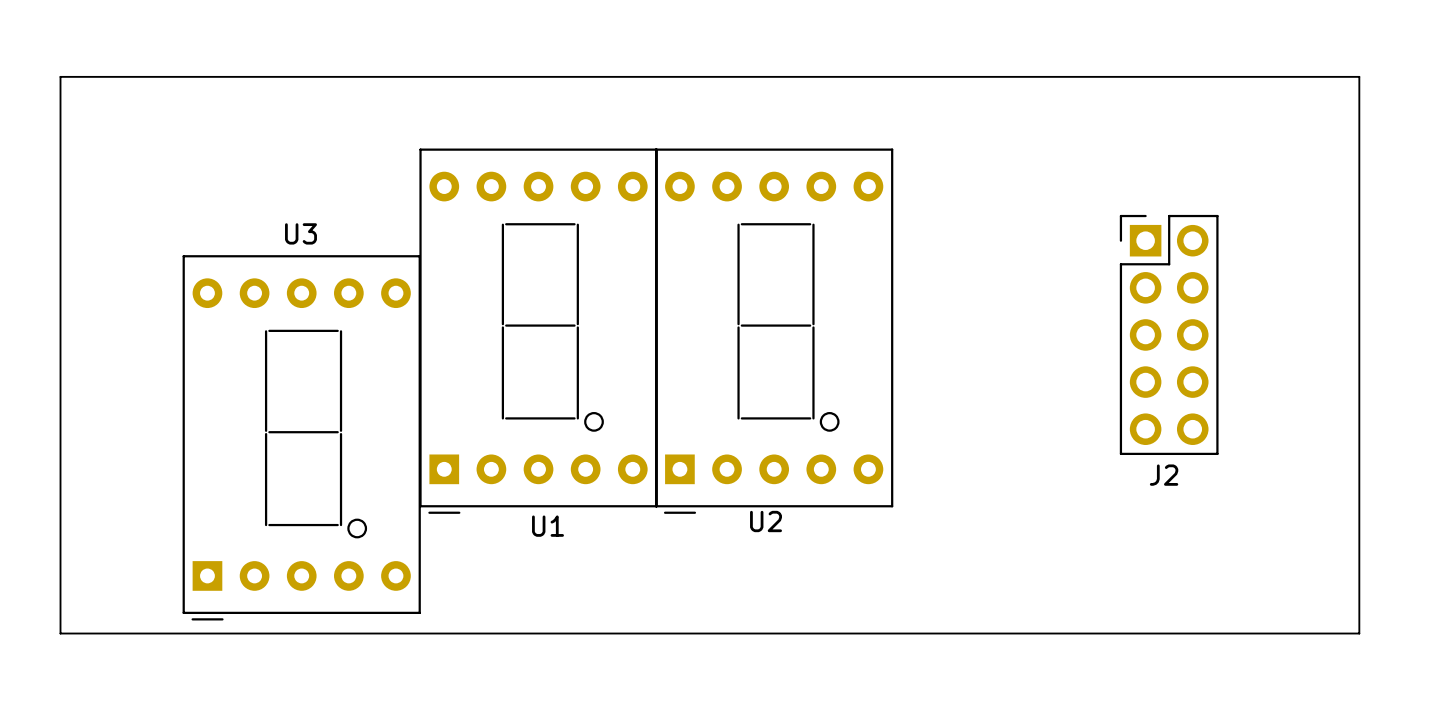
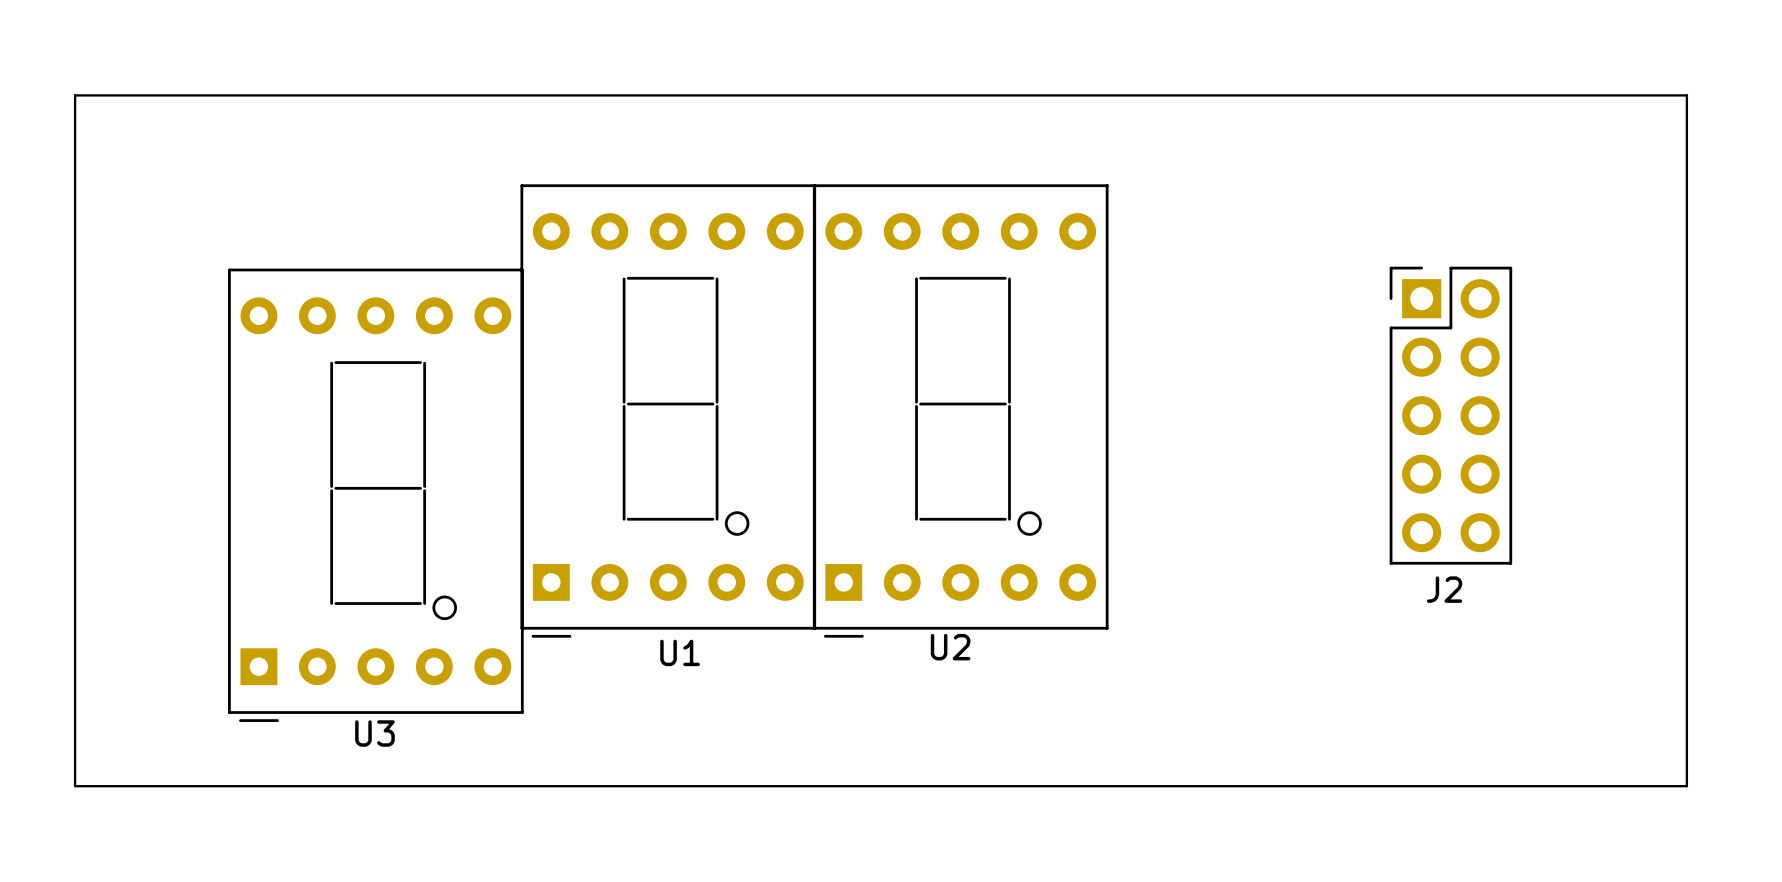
U3 name position: U3 (300, 233) -> U3 (374, 733)
U3 position: (301, 437) -> (375, 495)

